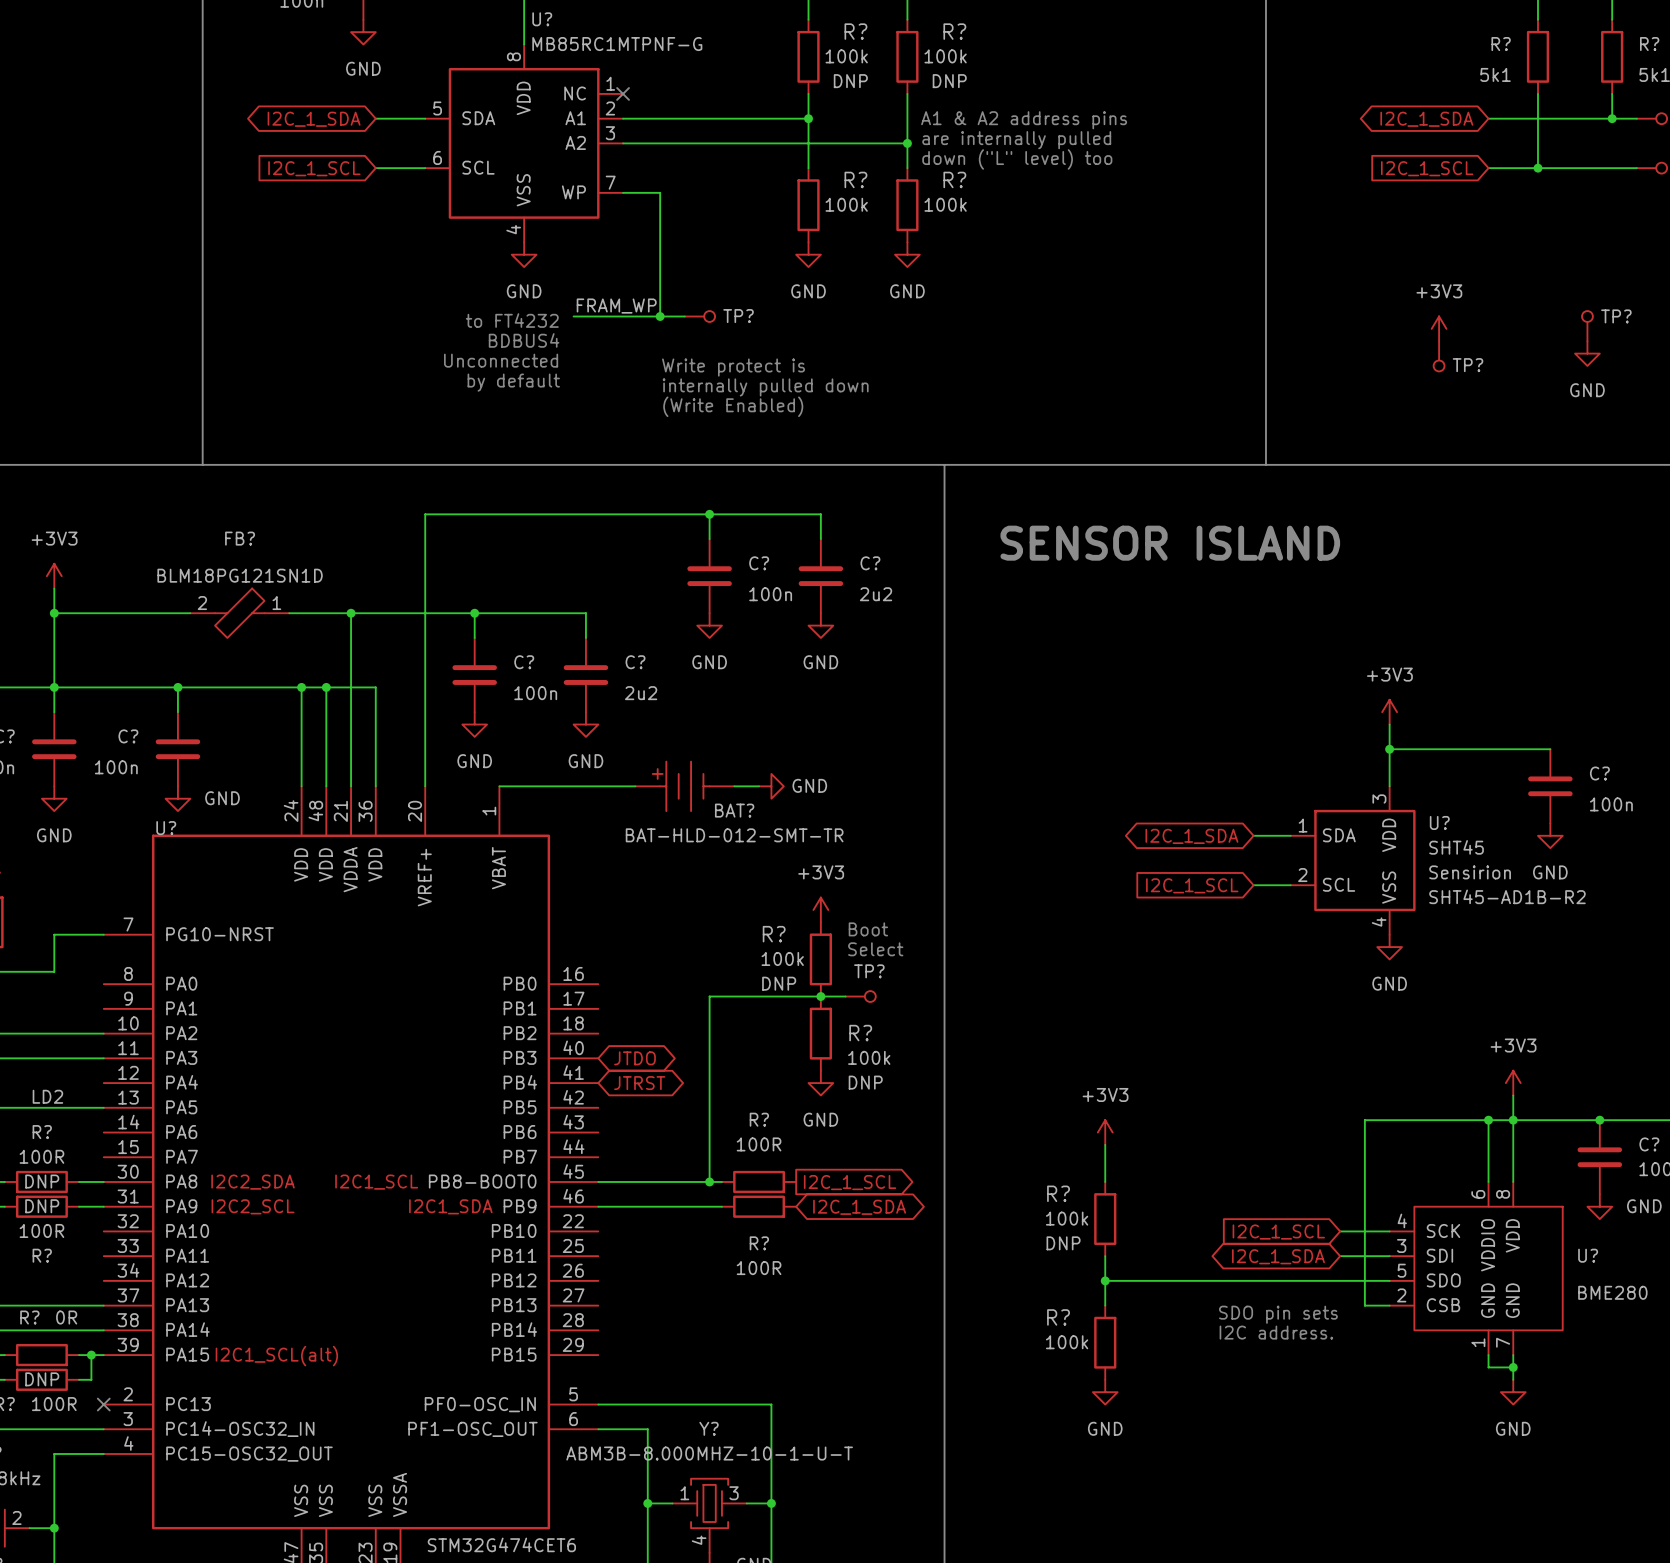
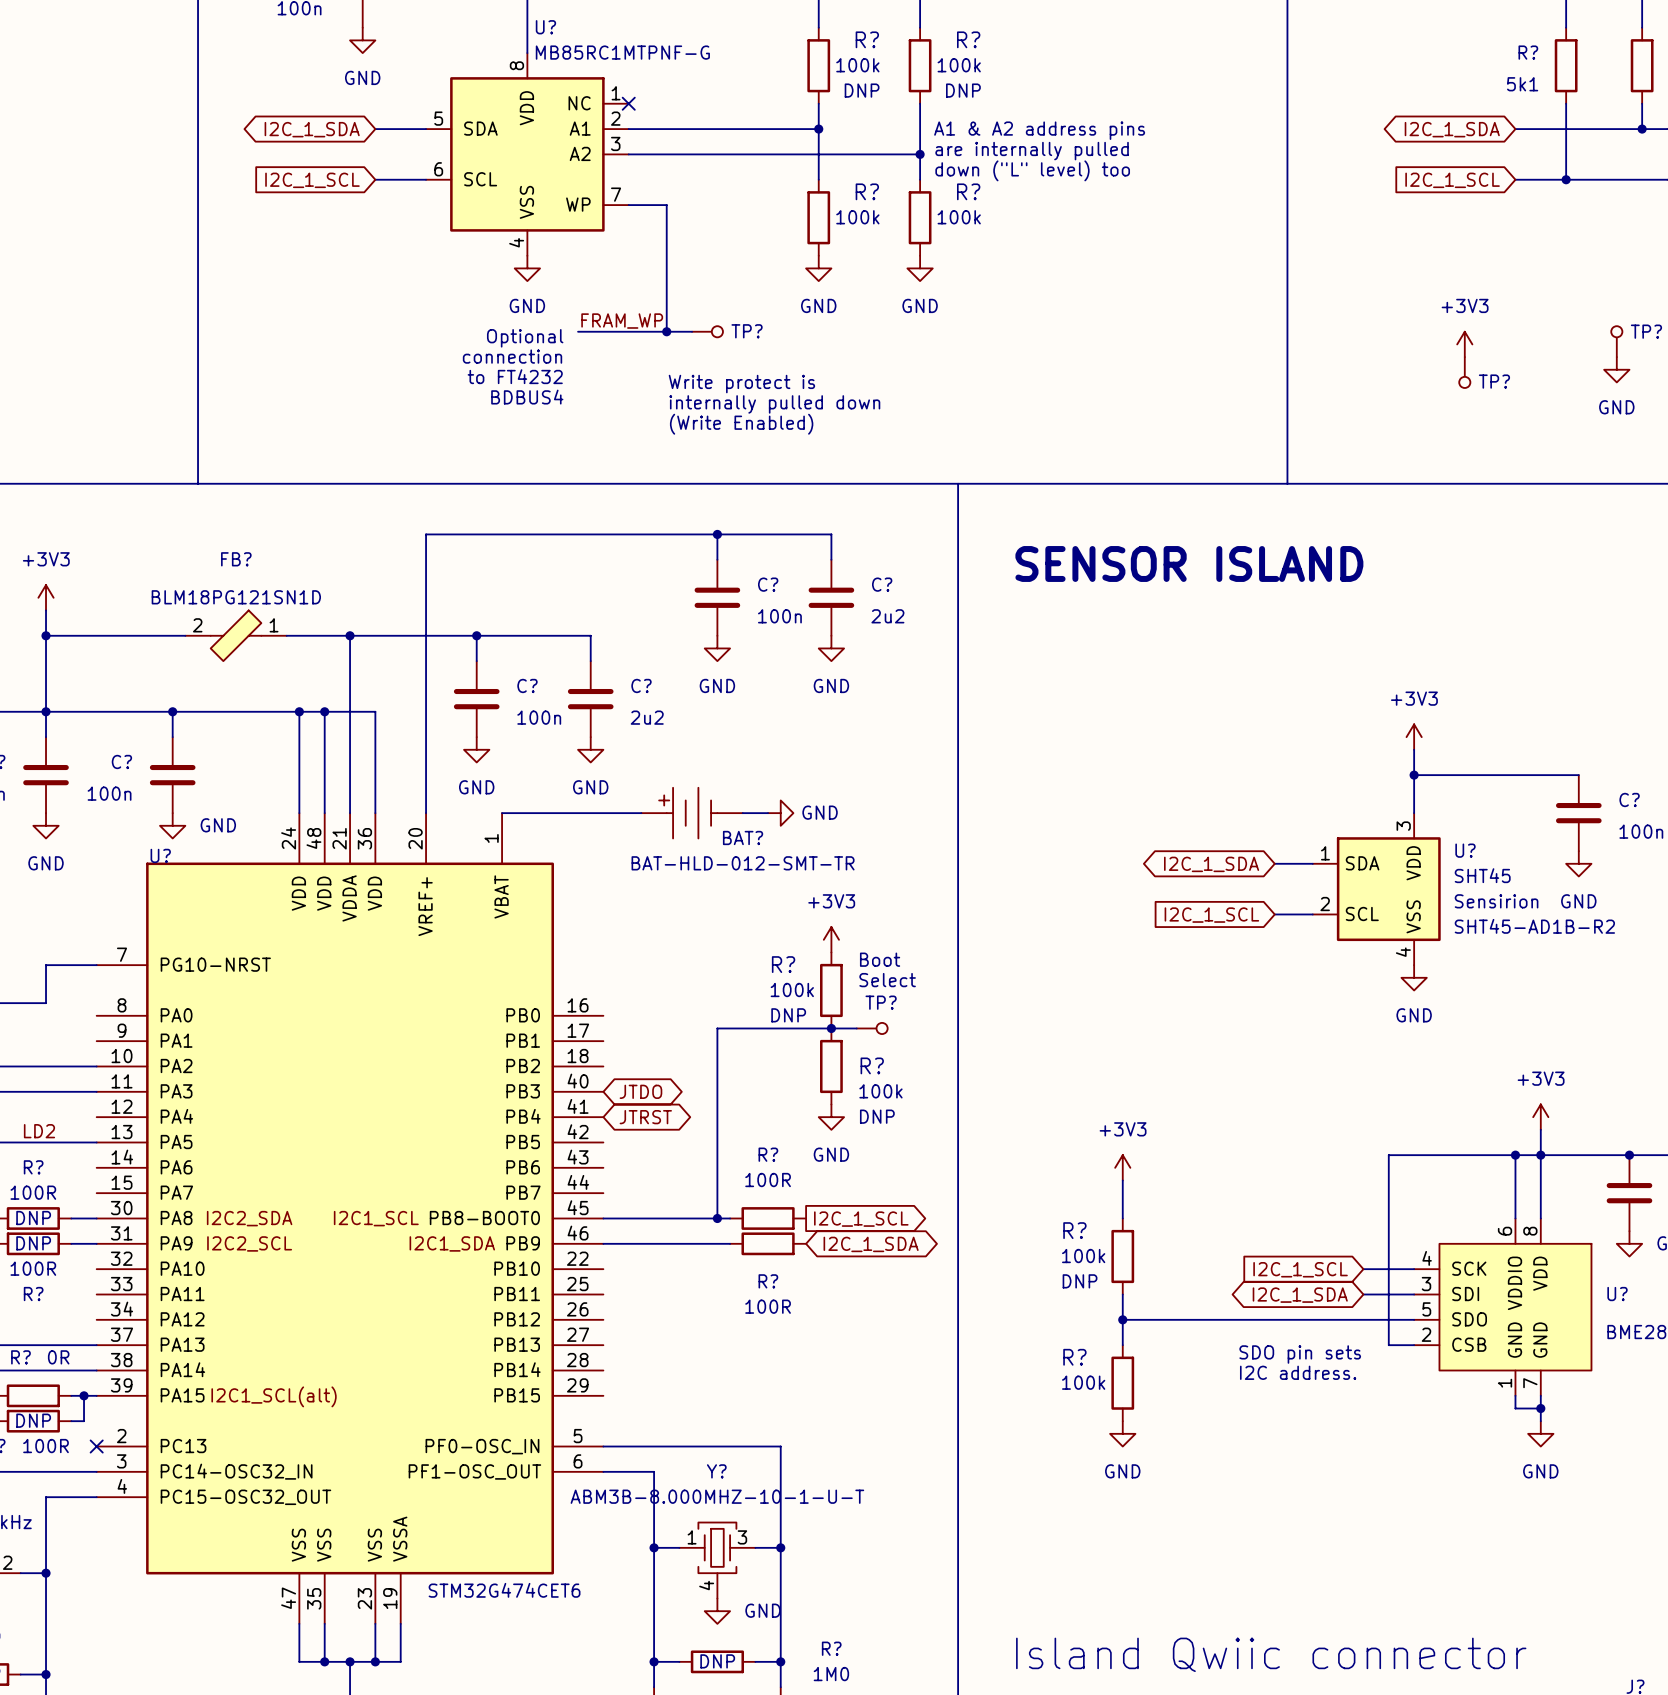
text: to FT4232 (512, 320) -> Optional (525, 338)
text: BDBUS4 (524, 340) -> connection (512, 356)
text: Unconnected (501, 360) -> to FT4232 (515, 376)
text: by default (513, 382) -> BDBUS4 (527, 397)

